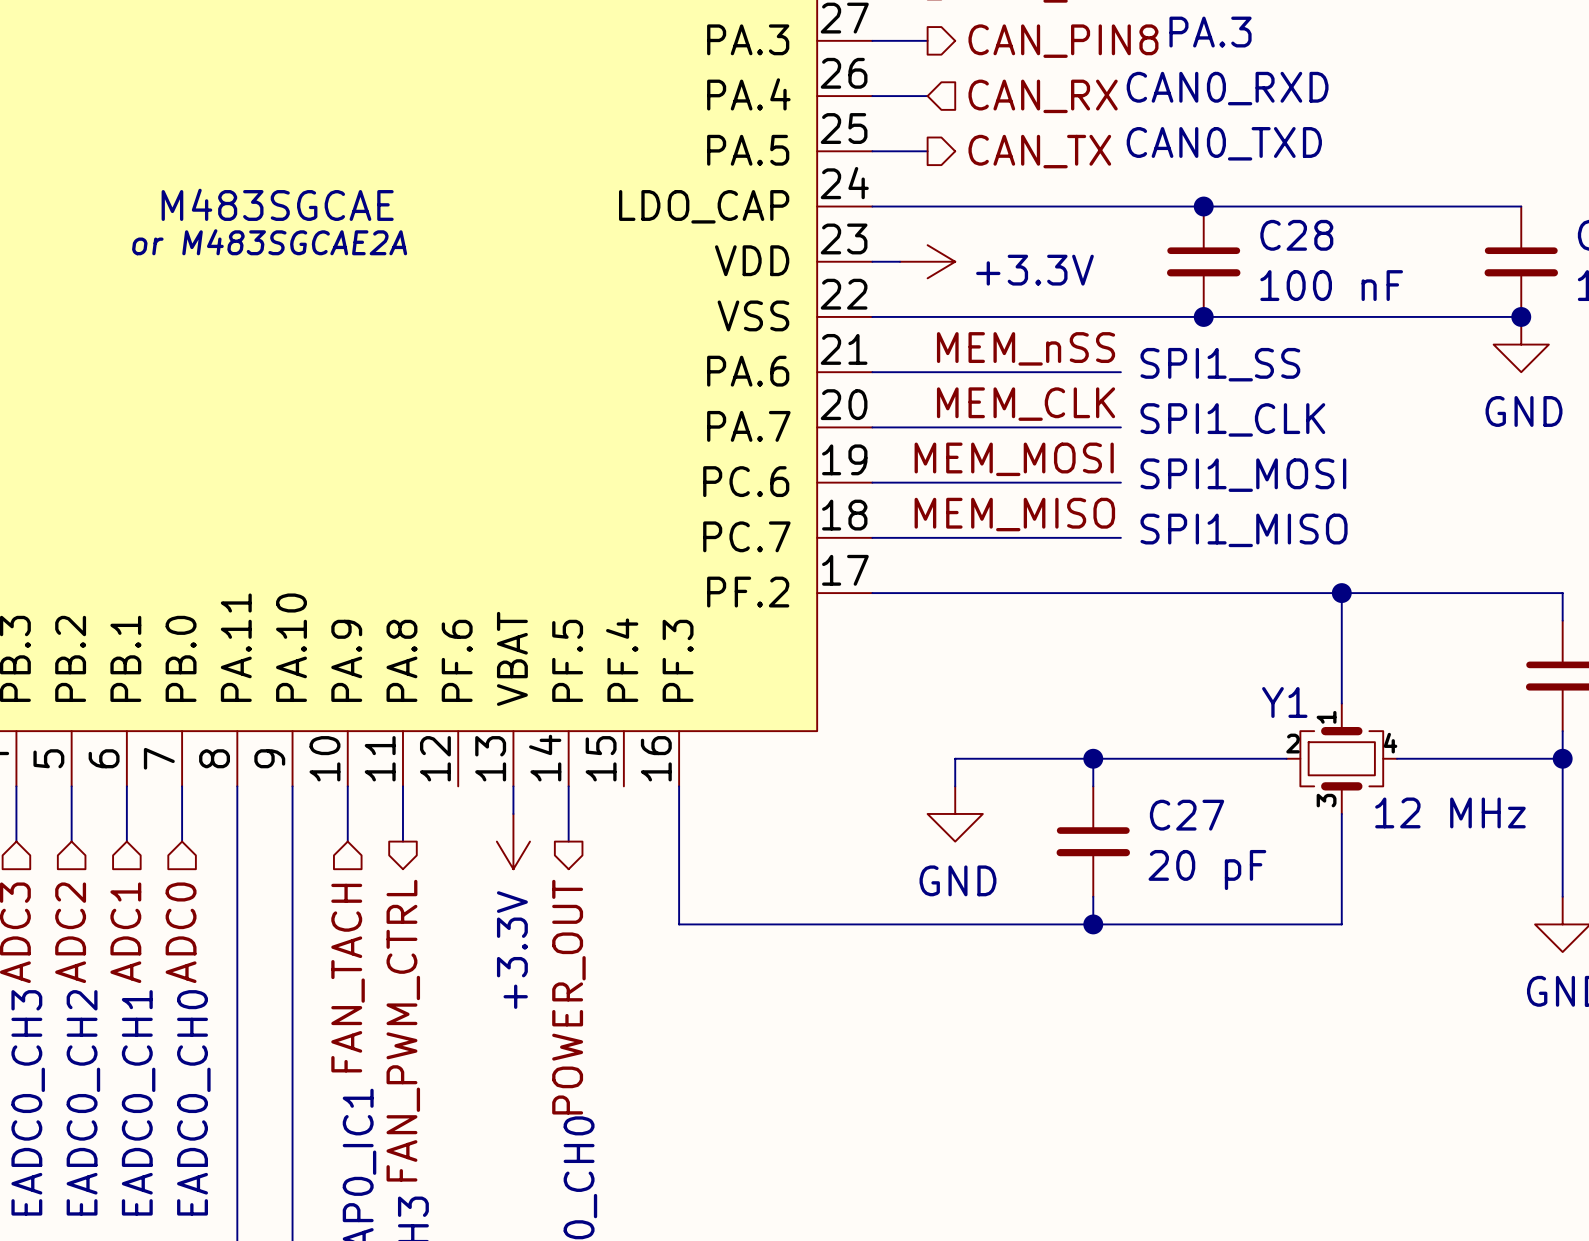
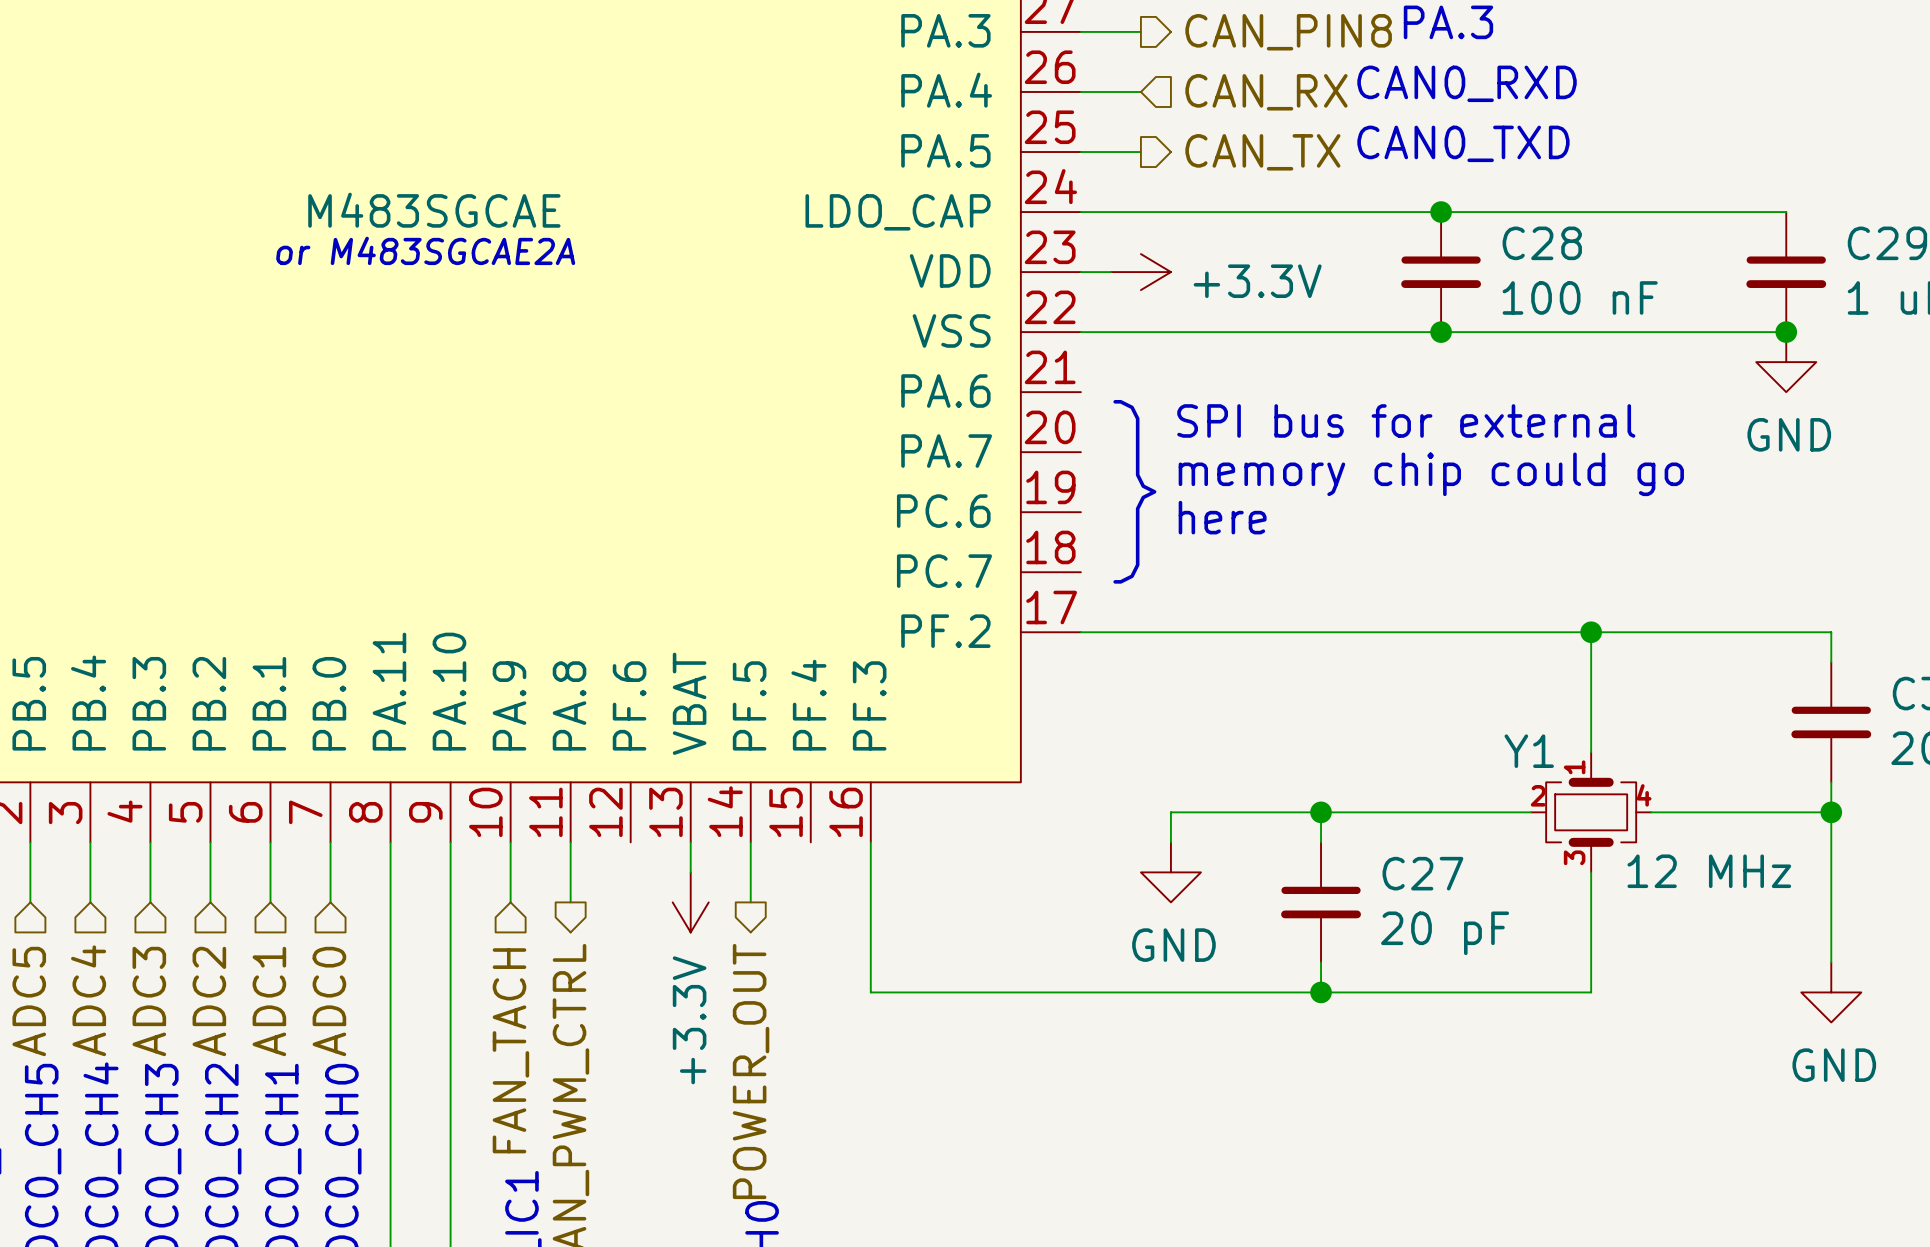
label: MEM_nSS (1026, 348) -> none
text: SPI1_SS (1220, 364) -> none
wire: (872, 372) (1120, 372) -> none
text: none -> SPI bus for external (1406, 420)
label: MEM_CLK (1026, 404) -> none
text: SPI1_CLK (1232, 419) -> none
wire: (872, 427) (1120, 427) -> none
text: none -> memory chip could go (1431, 474)
label: MEM_MOSI (1014, 459) -> none
text: none -> } (1134, 491)
text: SPI1_MOSI (1243, 475) -> none
wire: (872, 482) (1120, 482) -> none
text: none -> here (1222, 517)
label: MEM_MISO (1014, 514) -> none
text: SPI1_MISO (1244, 530) -> none
wire: (872, 537) (1120, 537) -> none

